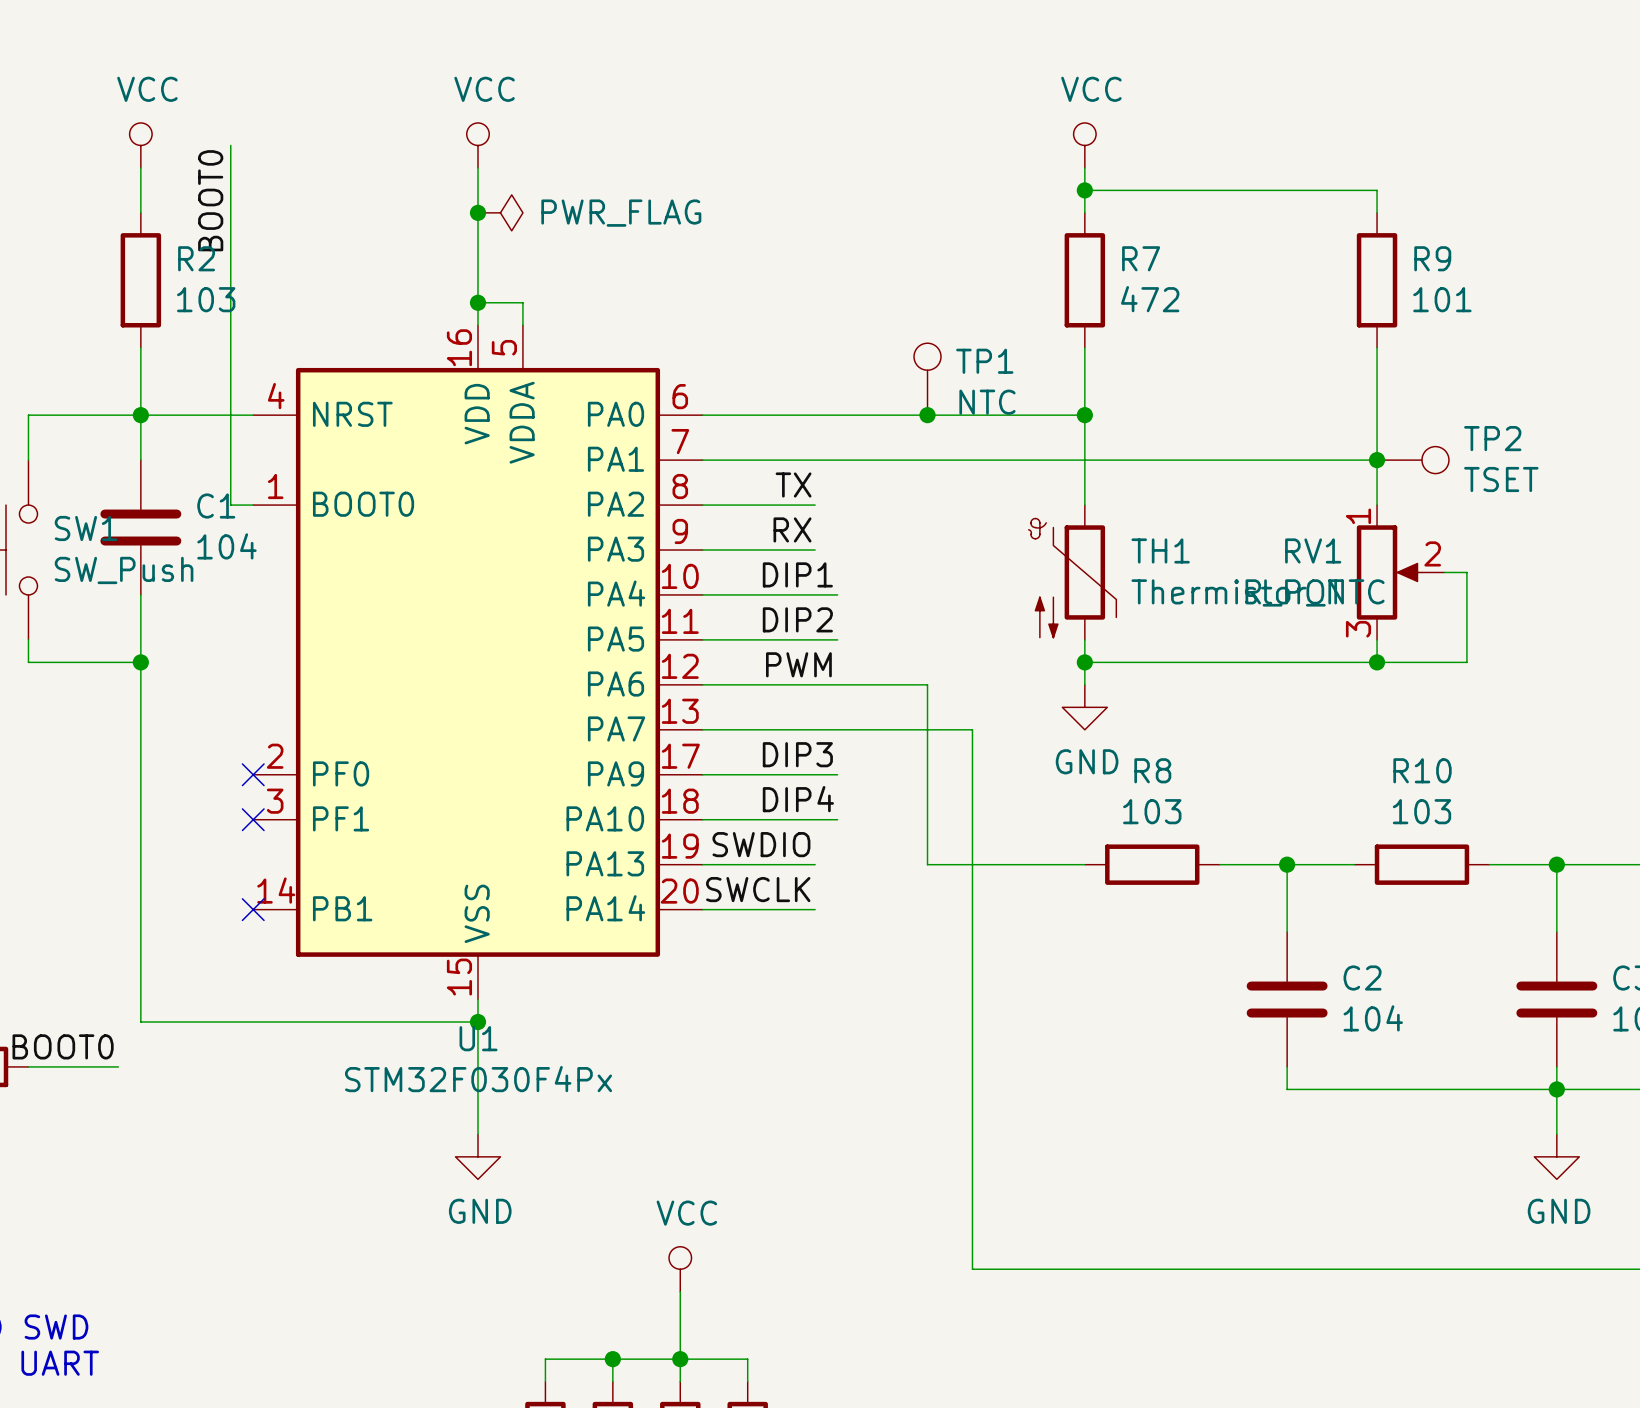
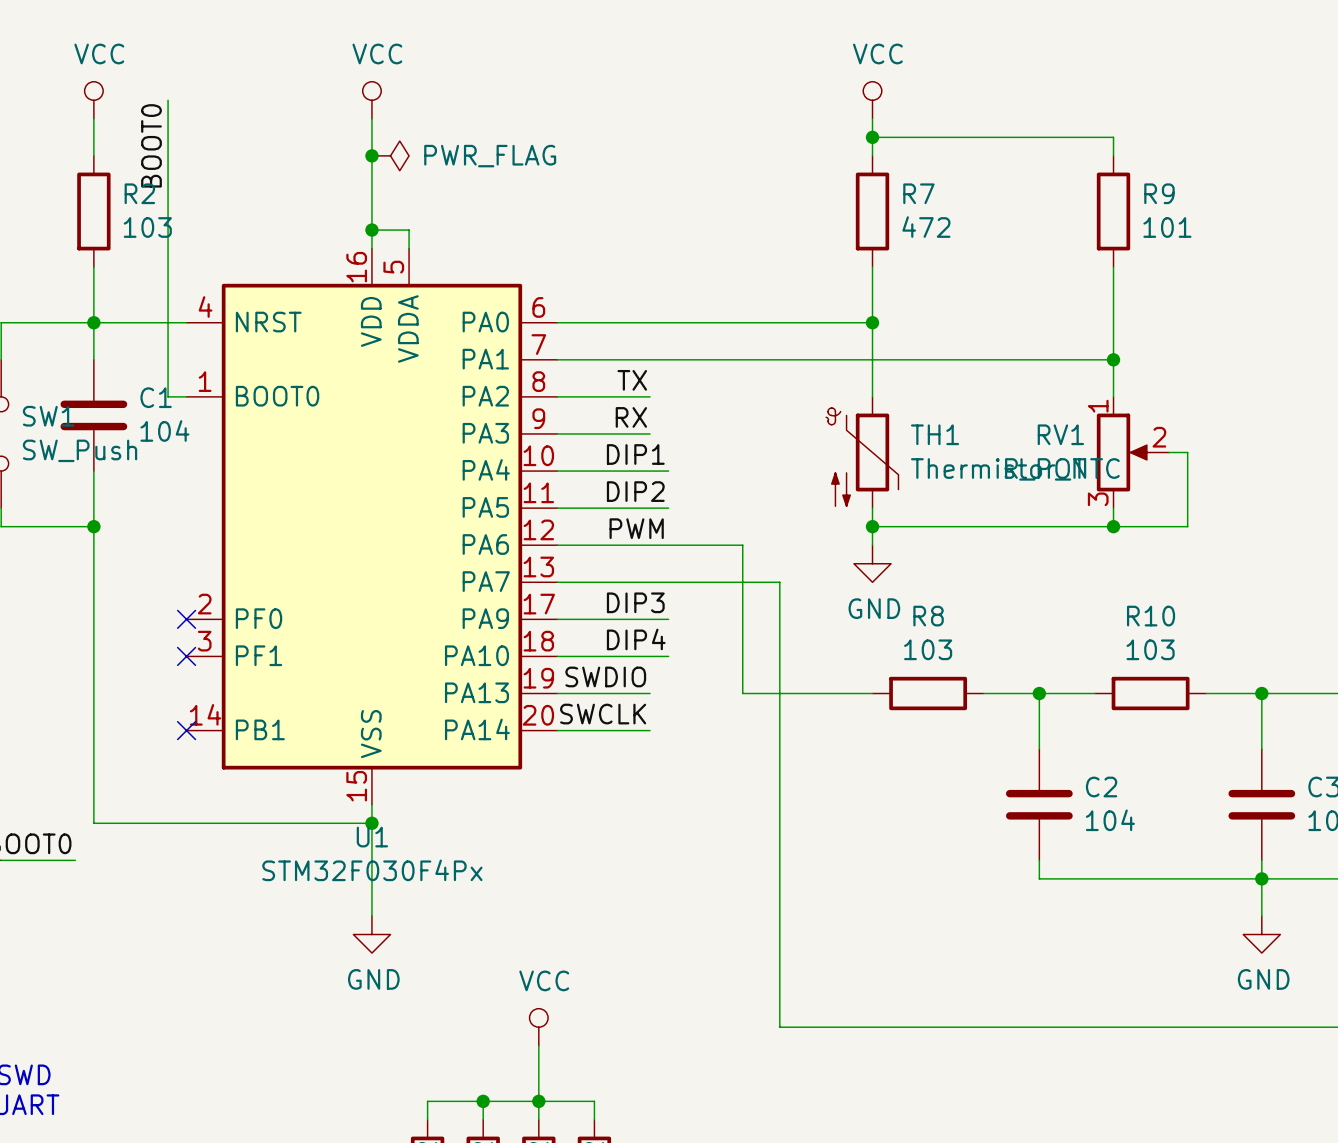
TP1: NTC (927, 379) -> none
junction: (927, 415) -> none
TP2: TSET (1412, 460) -> none

